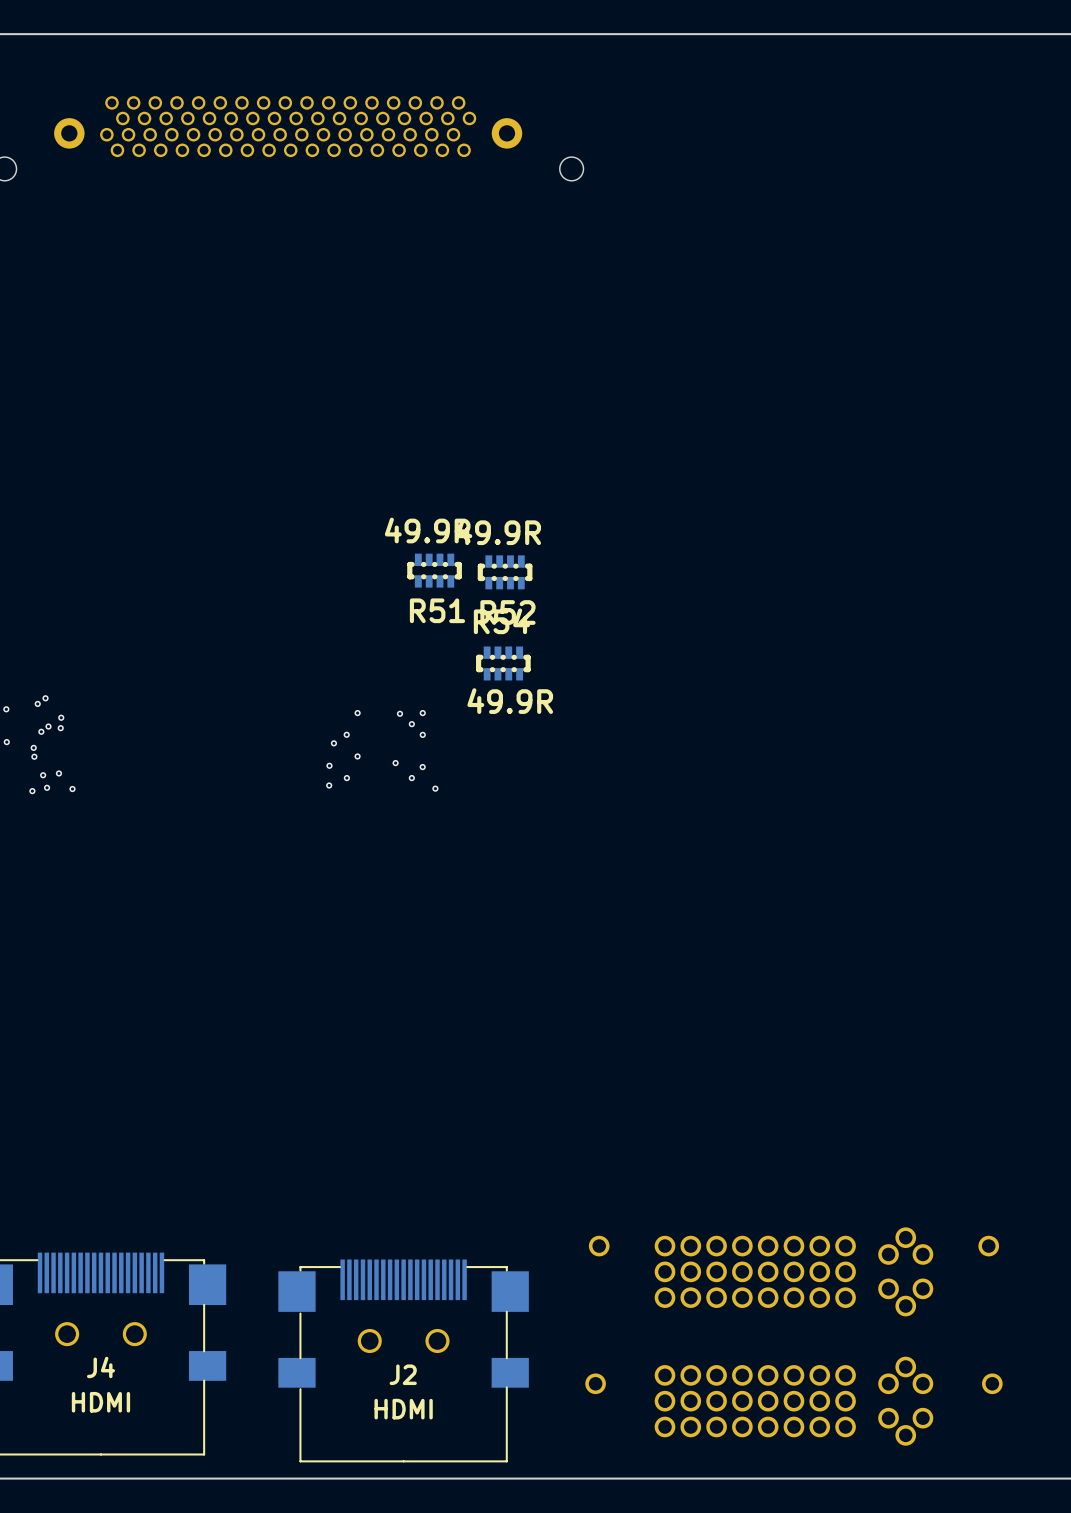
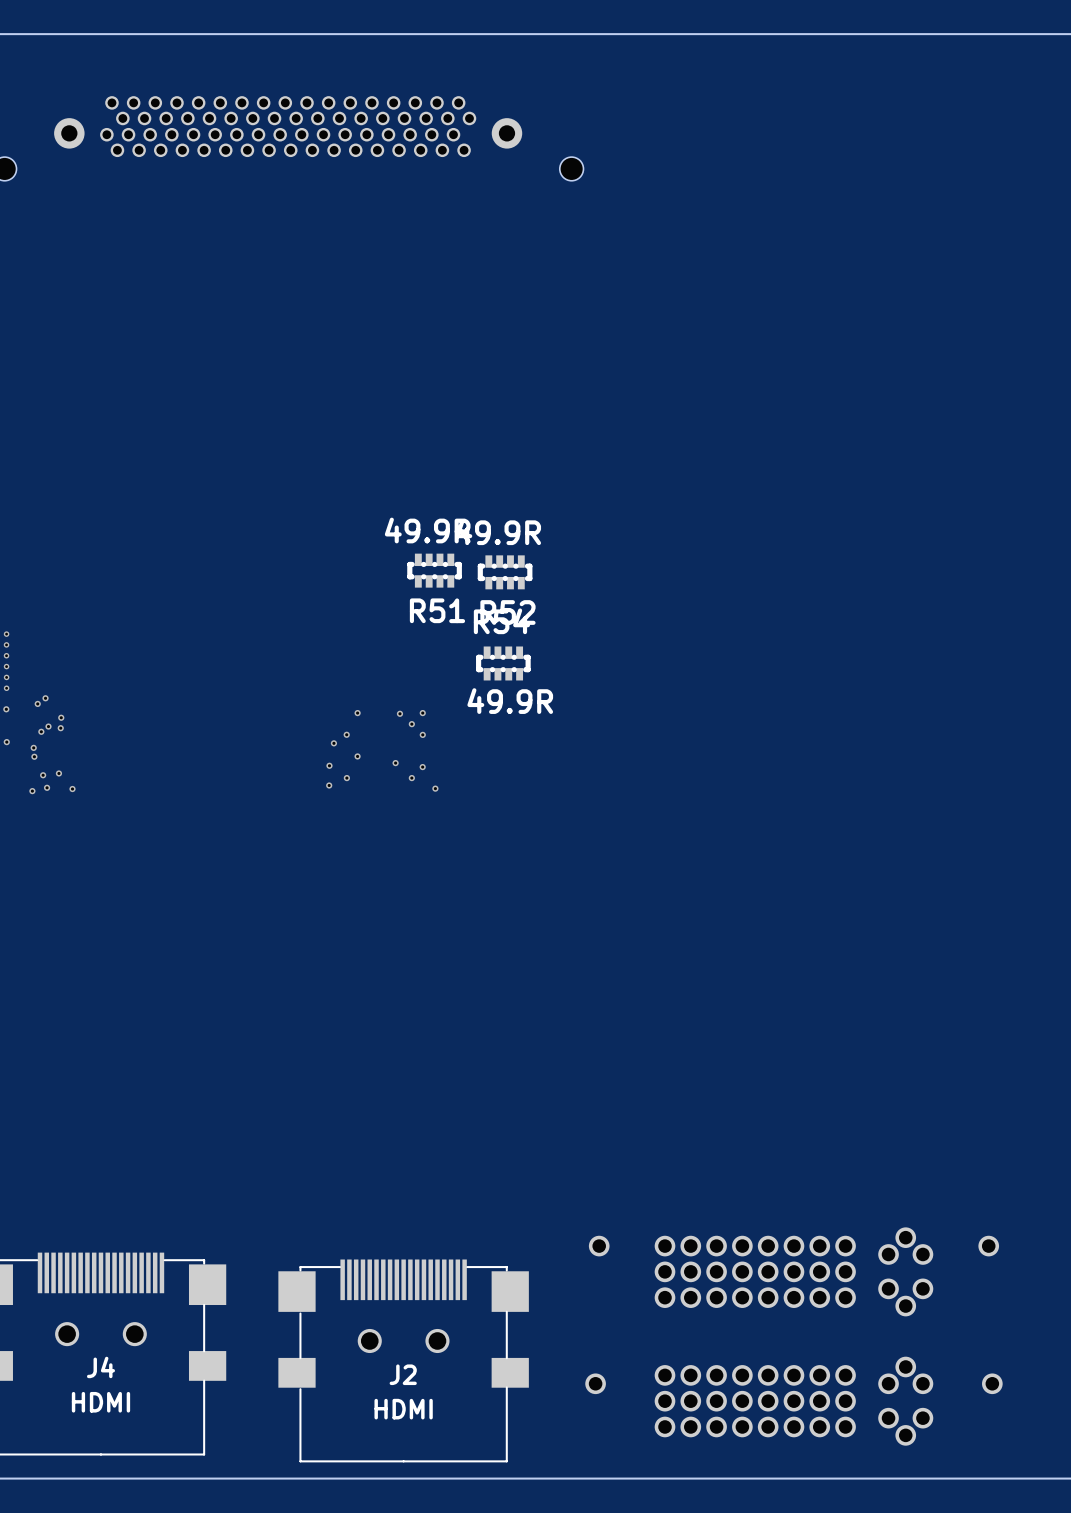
via: none -> (6, 634)
via: none -> (6, 644)
via: none -> (6, 655)
via: none -> (6, 666)
via: none -> (6, 677)
via: none -> (6, 688)

